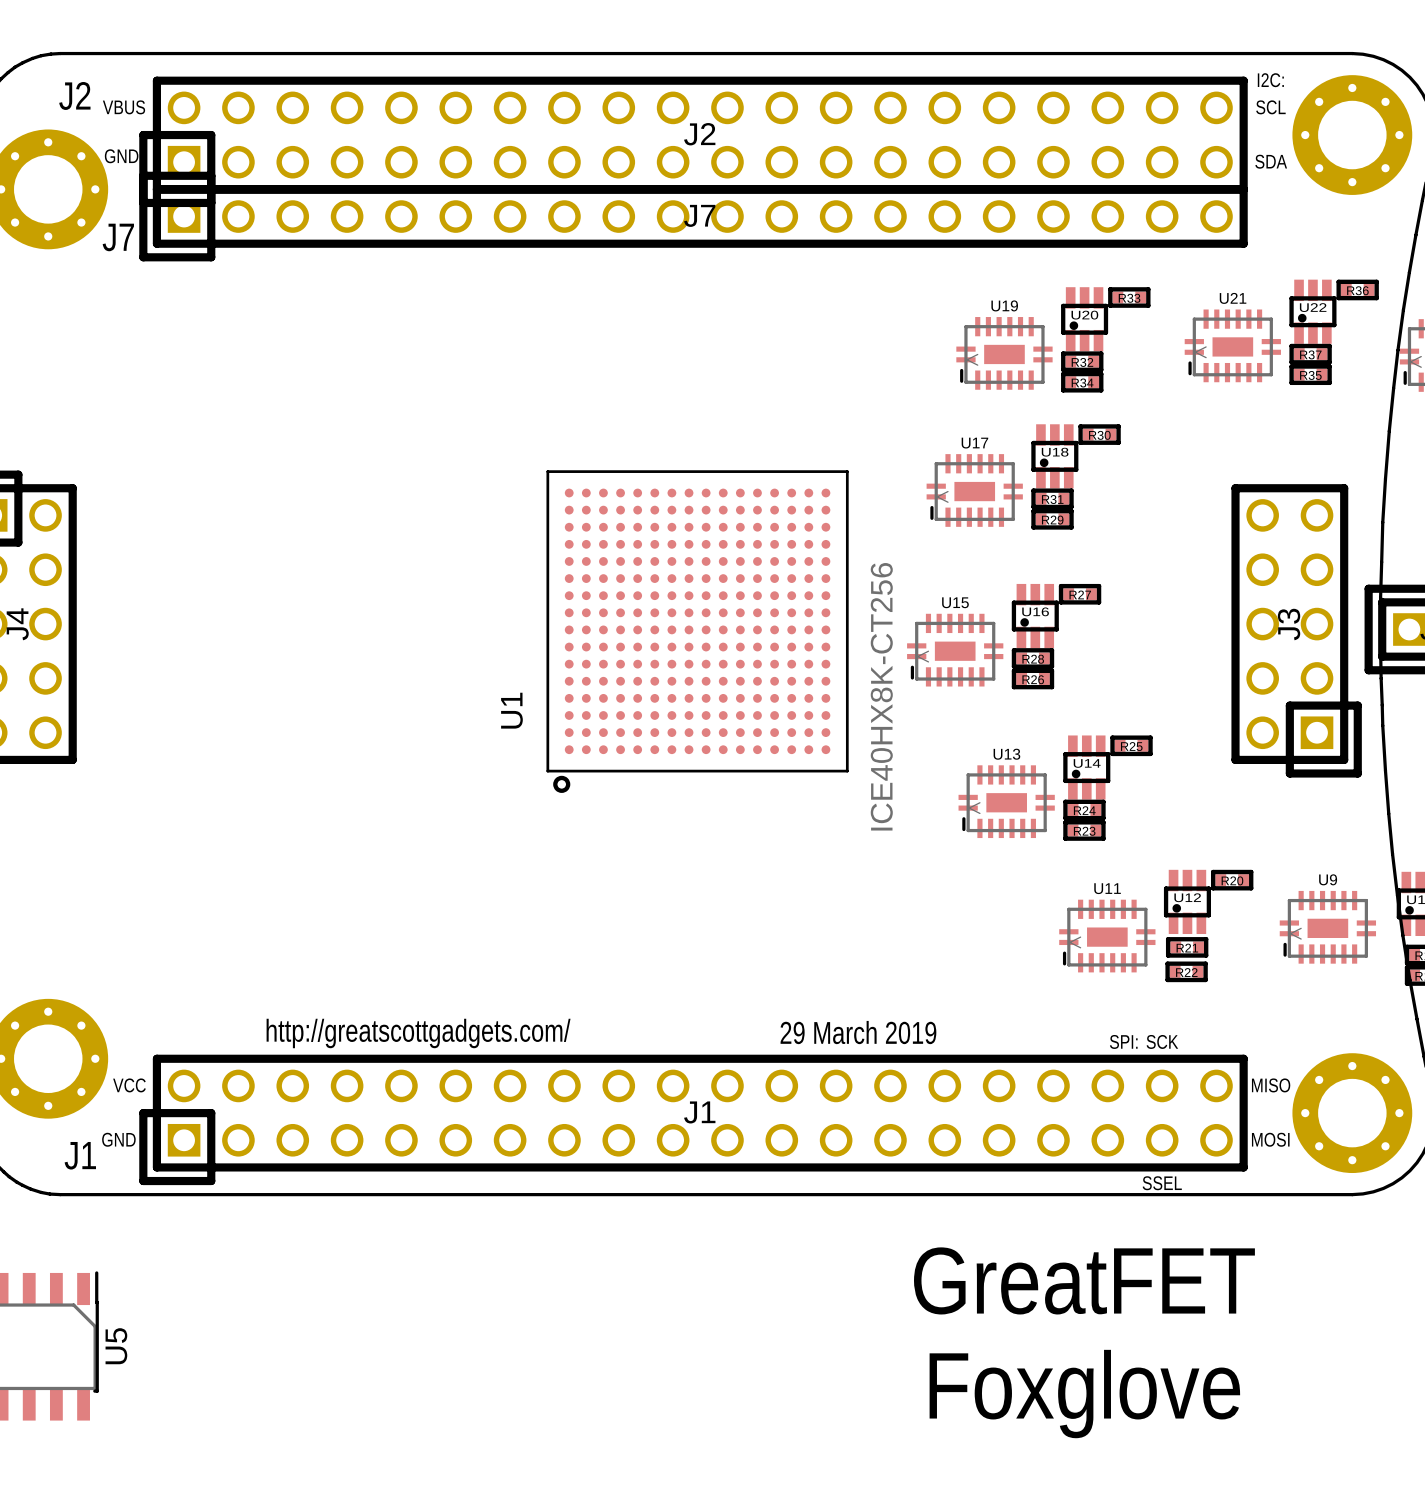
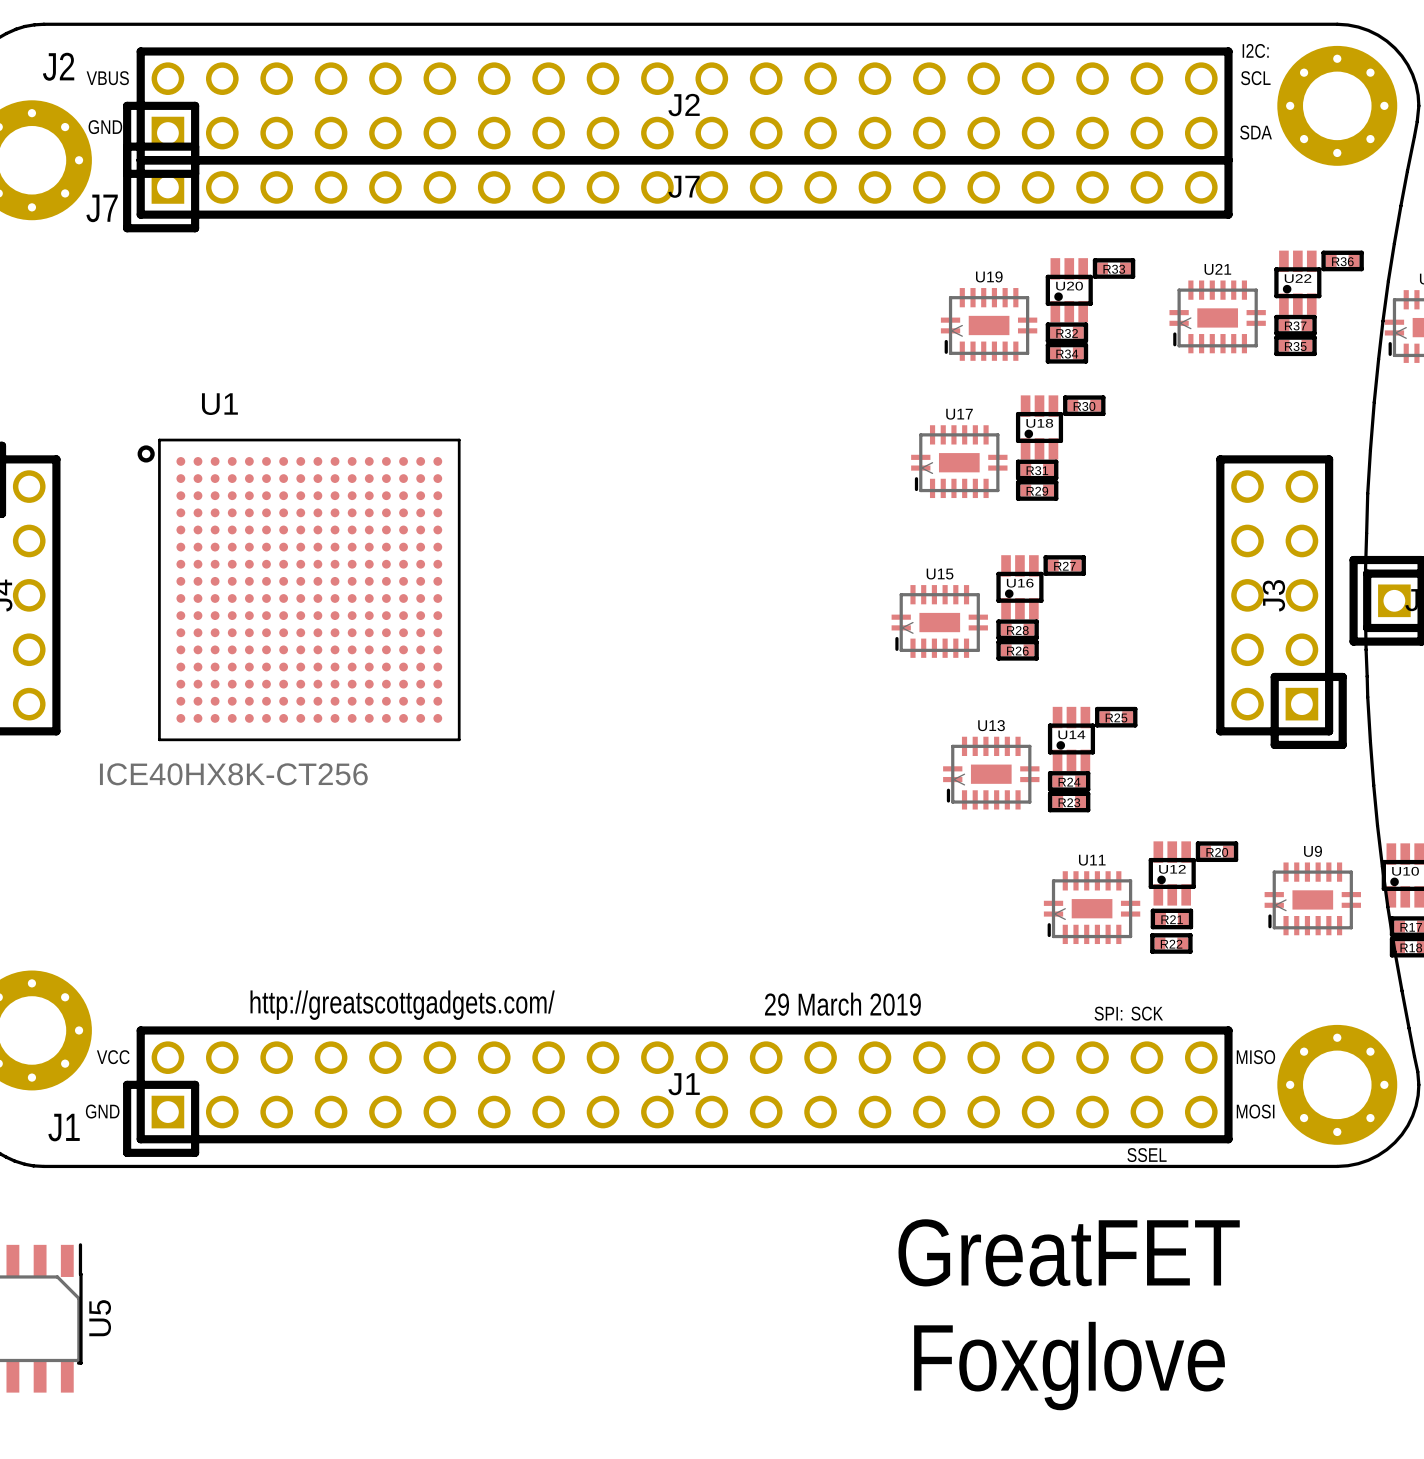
U1 rotation: 0° (697, 631) -> 90° clockwise (299, 589)
U1 position: (697, 631) -> (299, 589)

